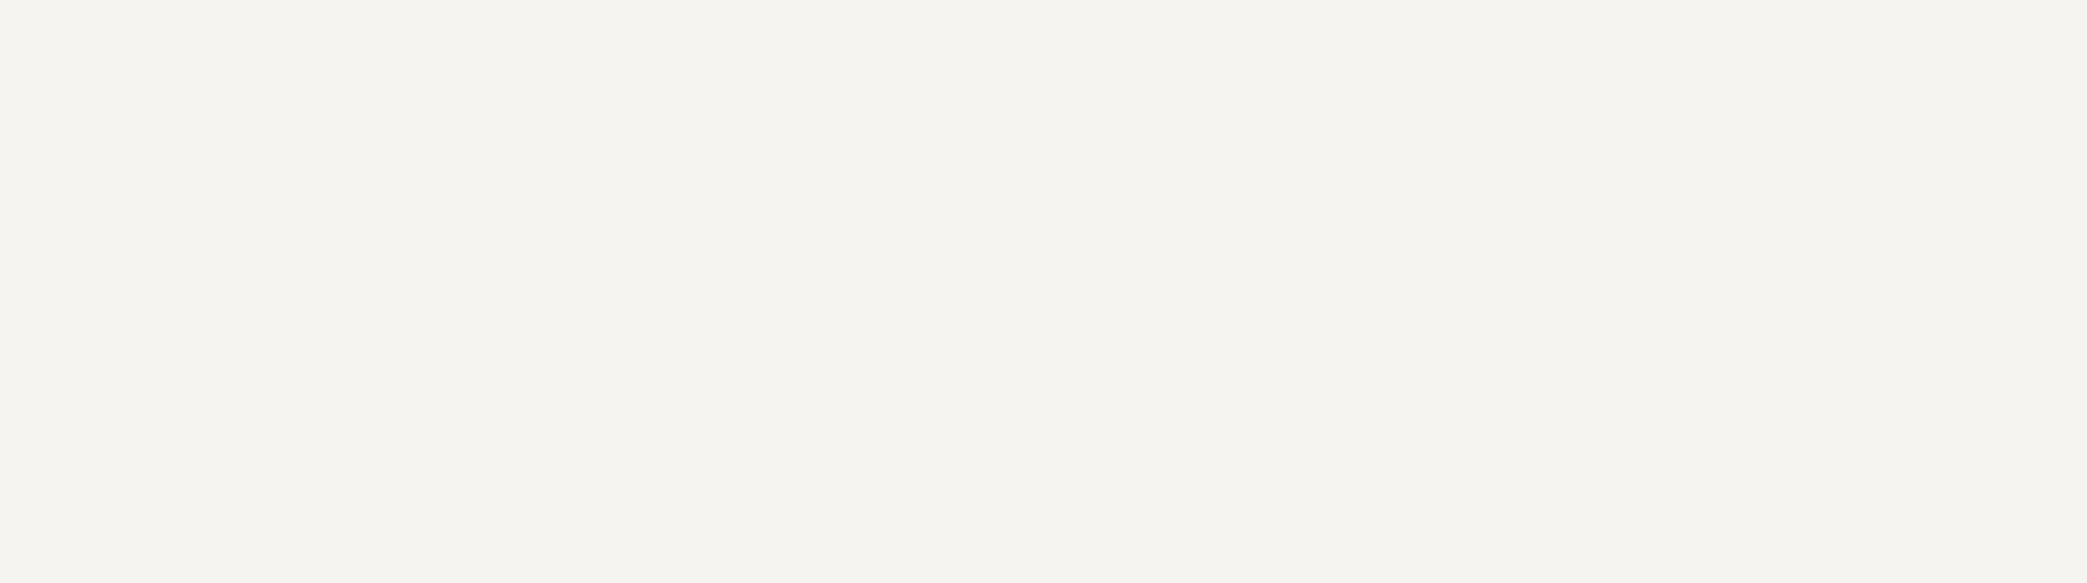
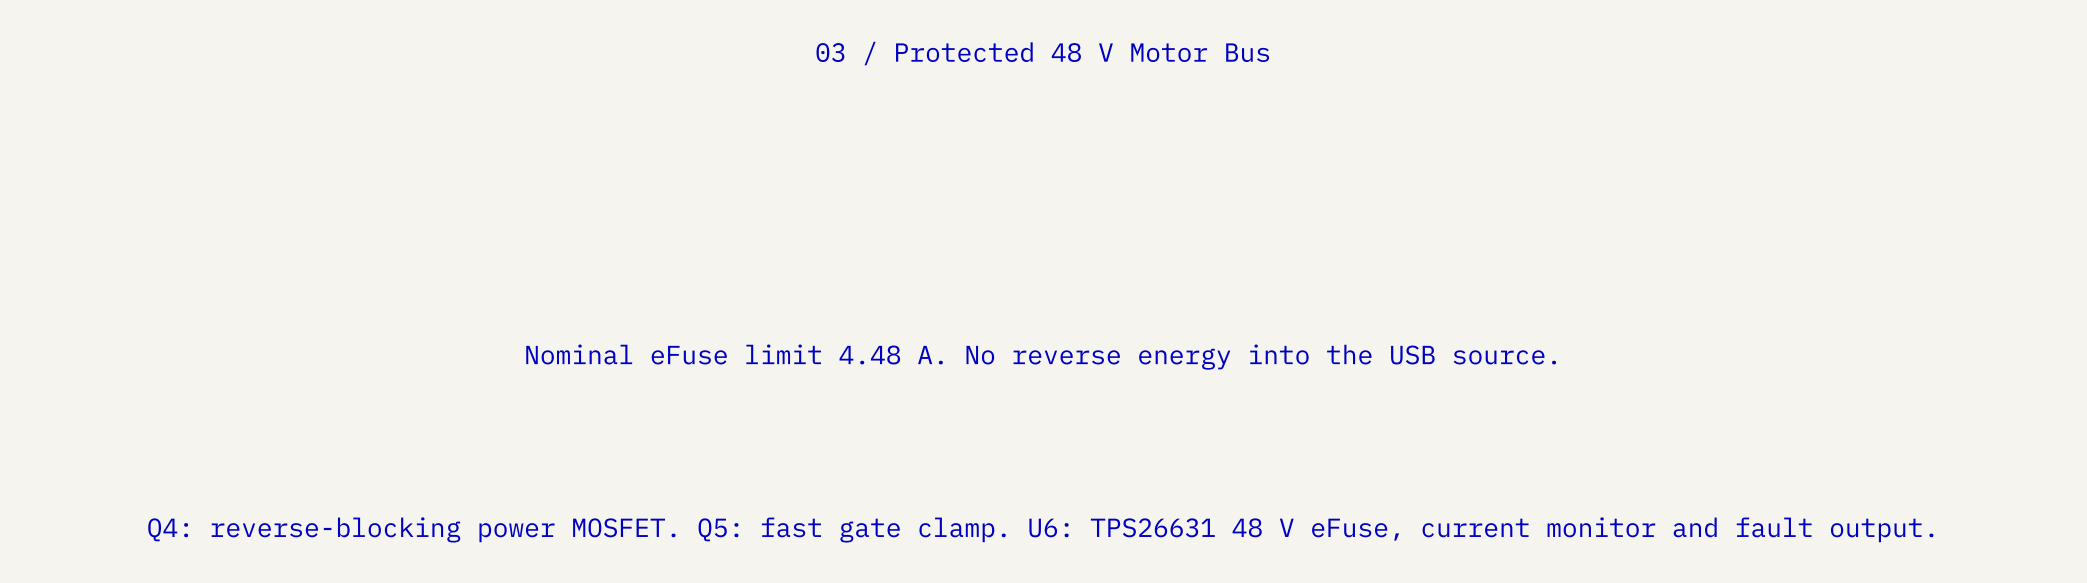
text: none -> 03 / Protected 48 V Motor Bus (1042, 53)
text: none -> Nominal eFuse limit 4.48 A. No reverse energy into the USB source. (1041, 357)
text: none -> Q4: reverse-blocking power MOSFET. Q5: fast gate clamp. U6: TPS26631 48 V eFuse, current monitor and fault output. (1040, 529)

